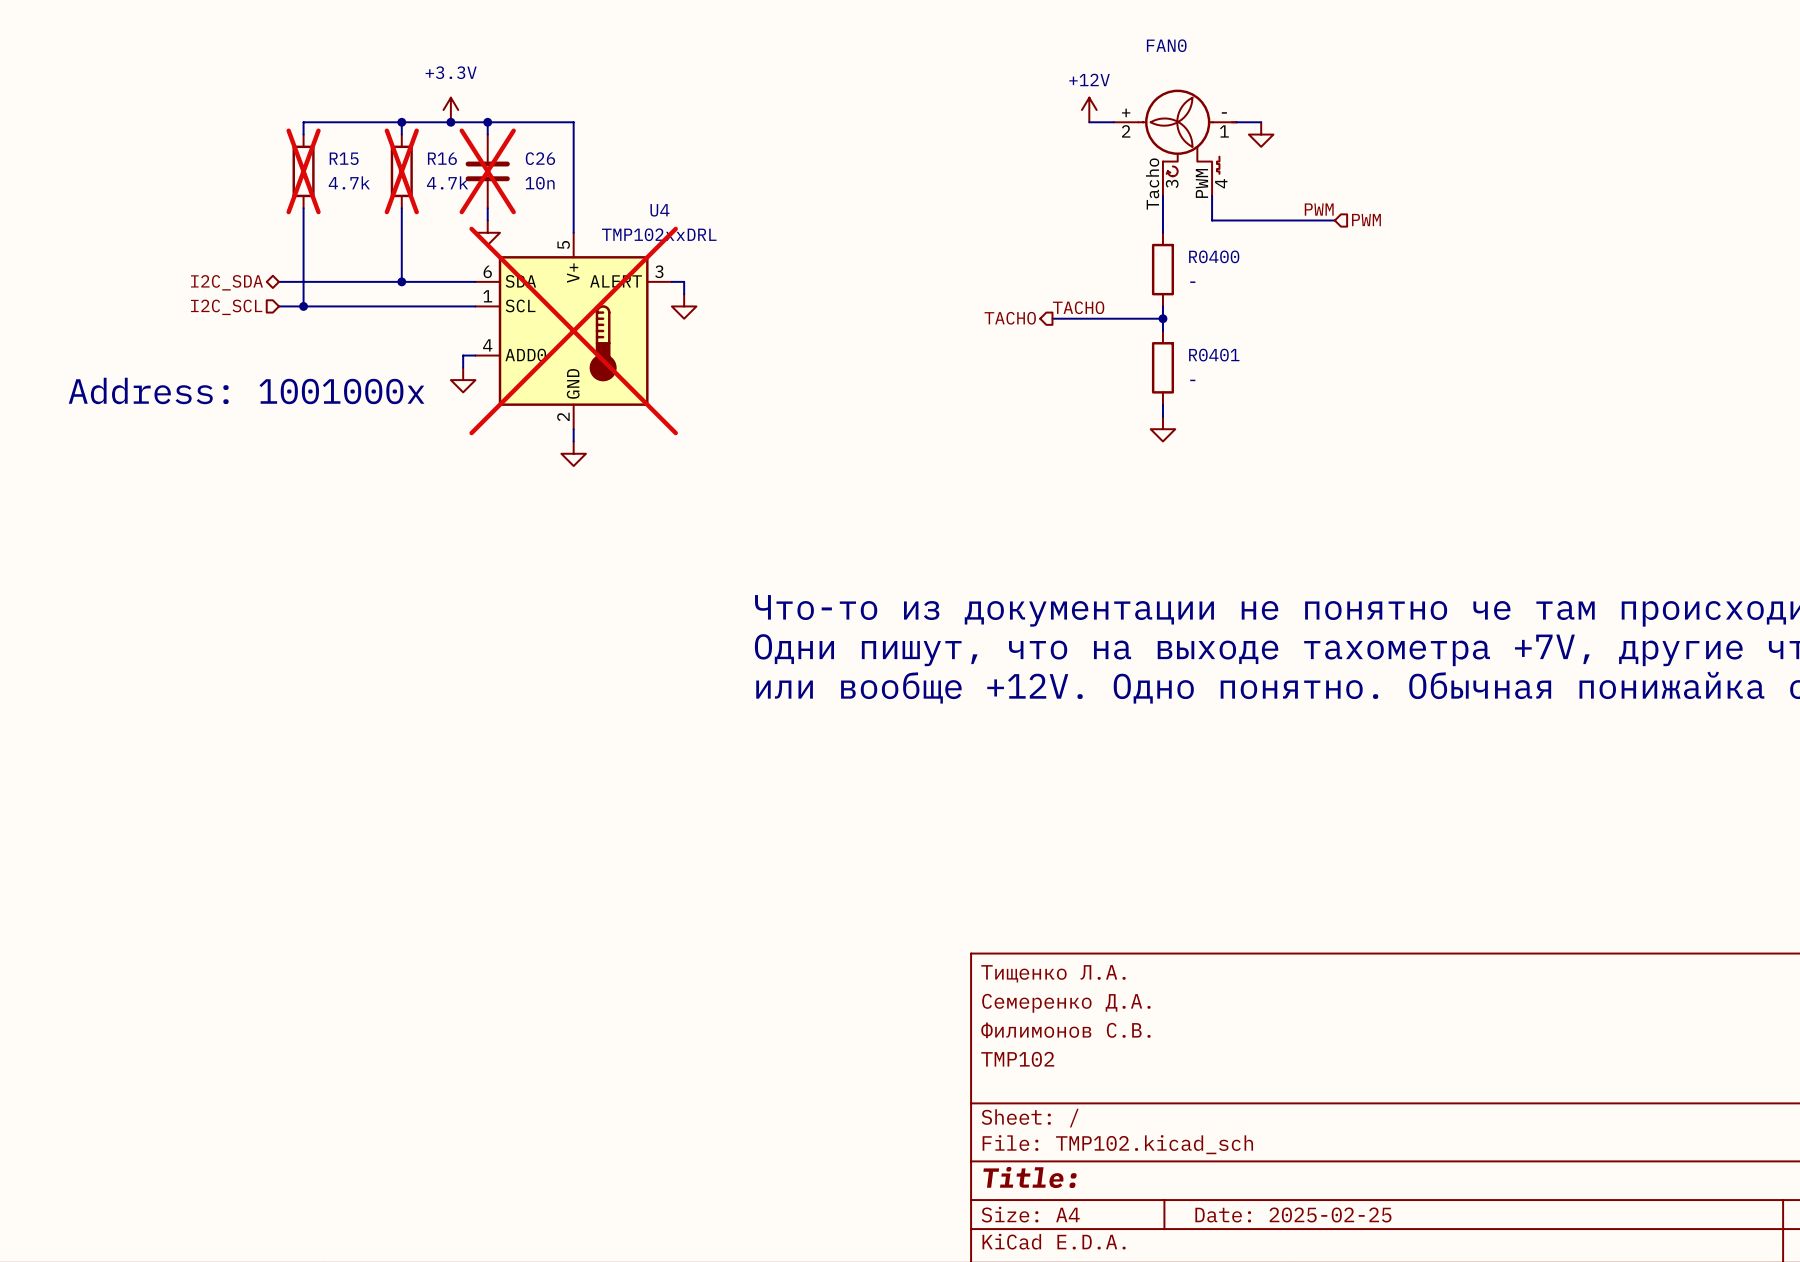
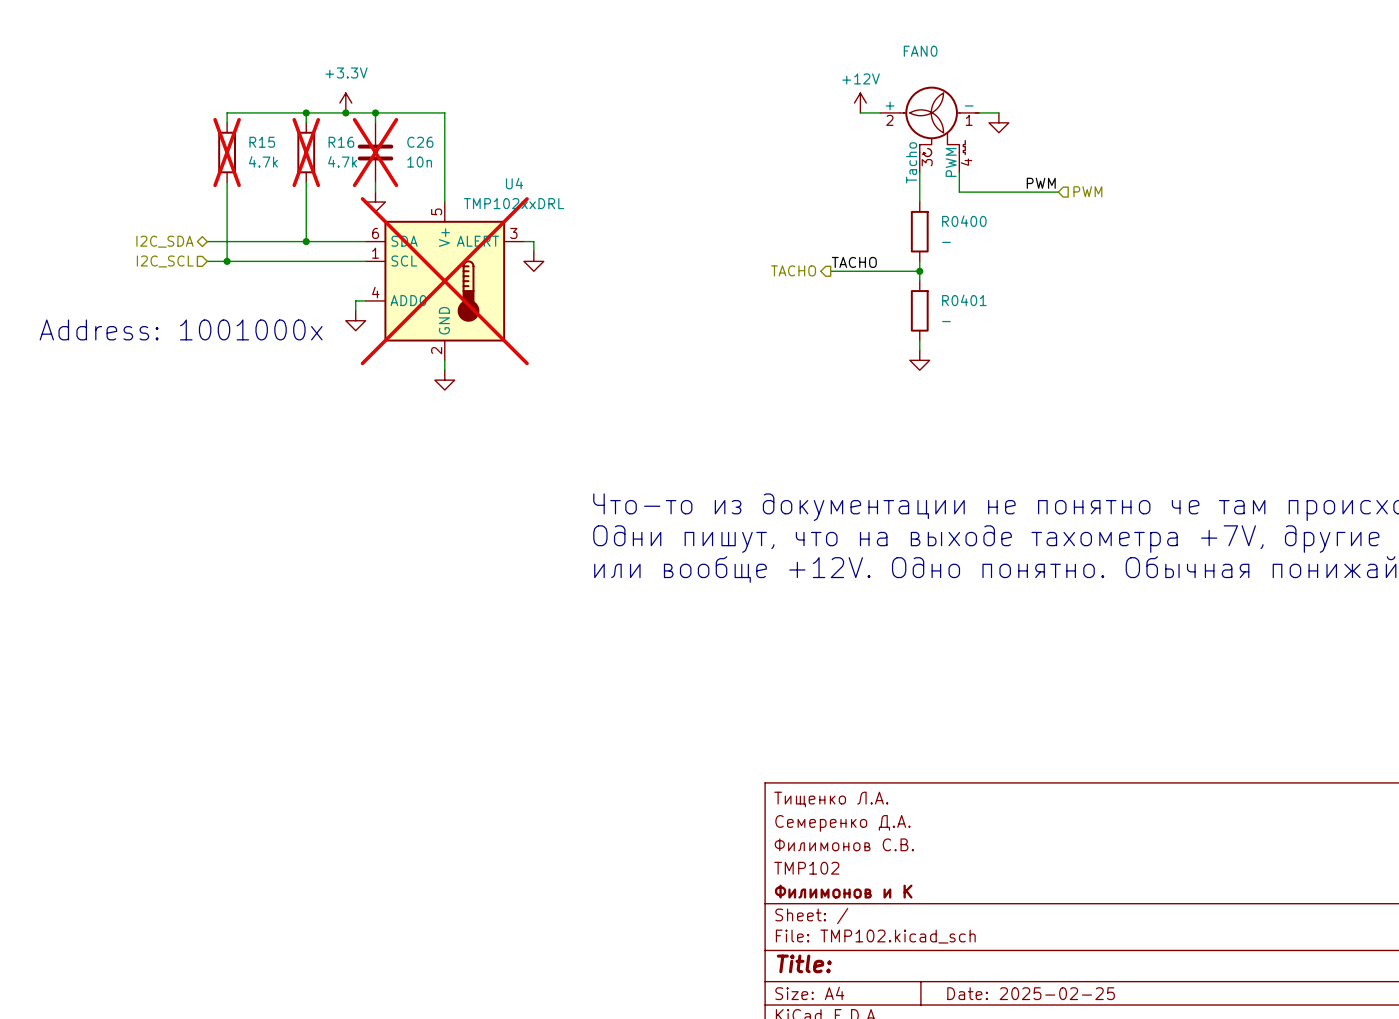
title block: none -> Филимонов и К (843, 891)

